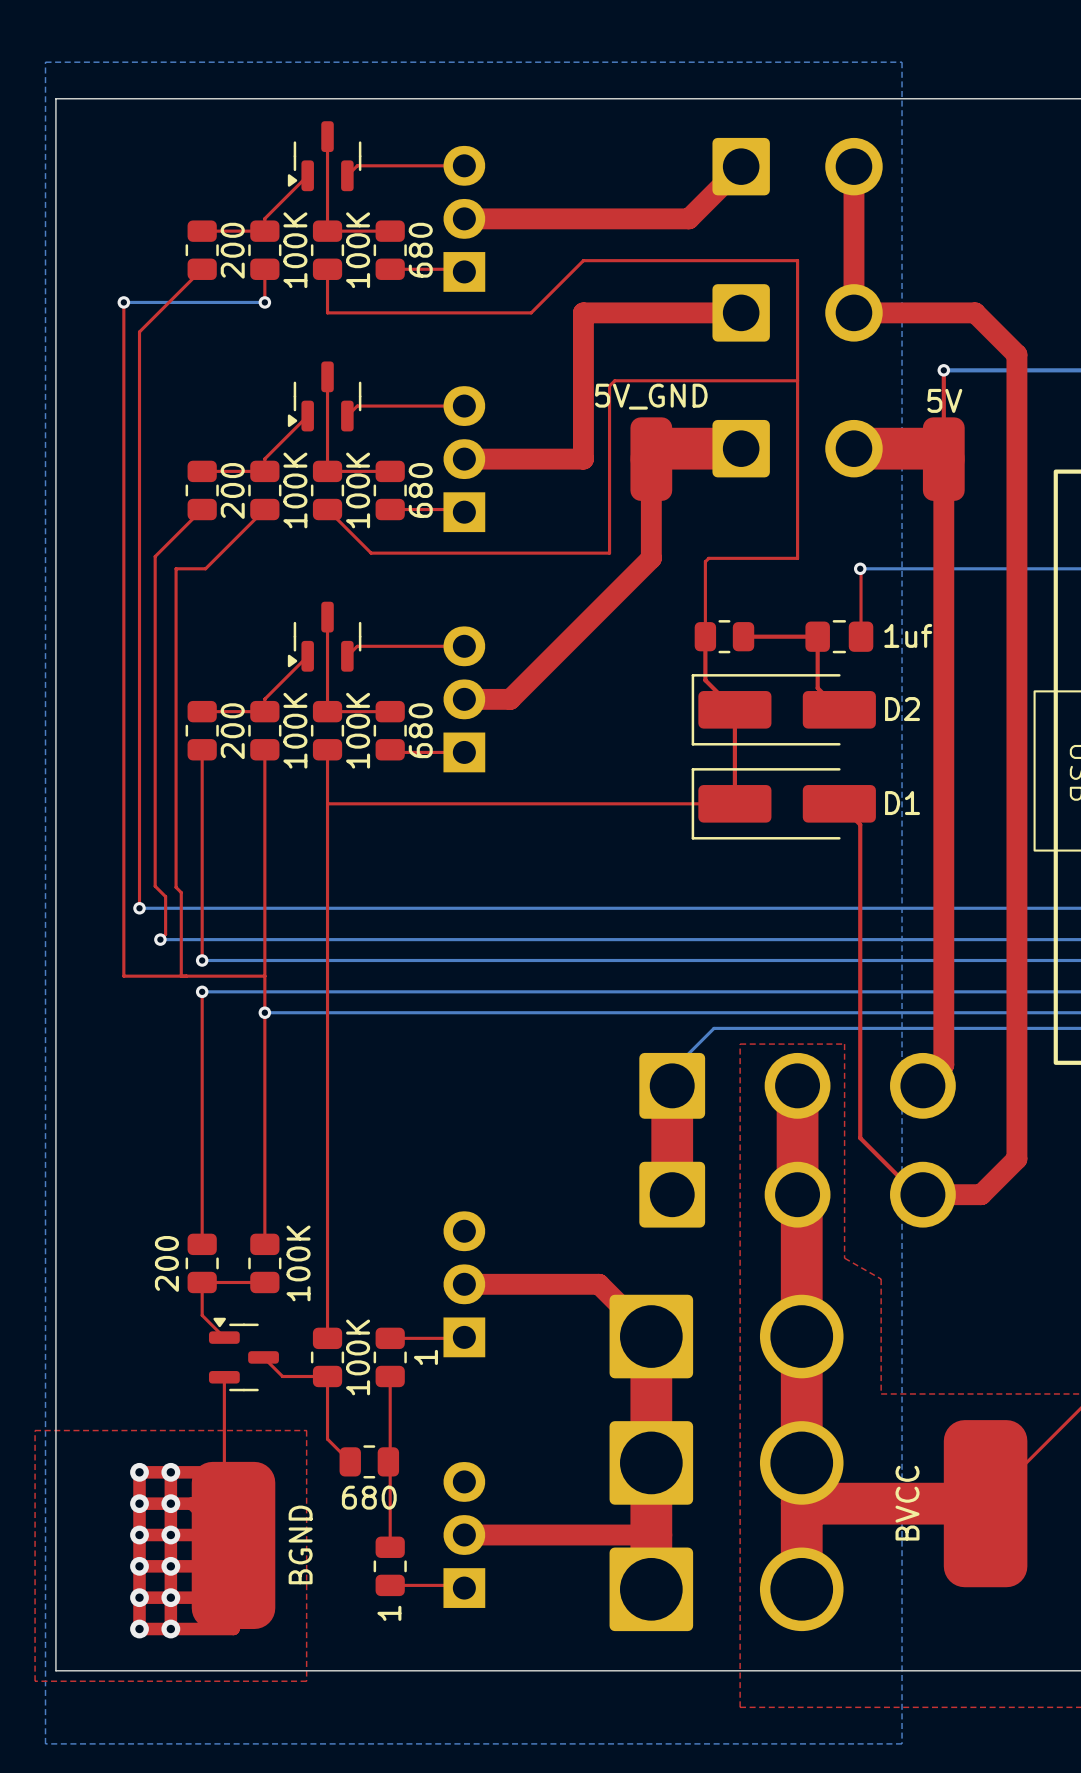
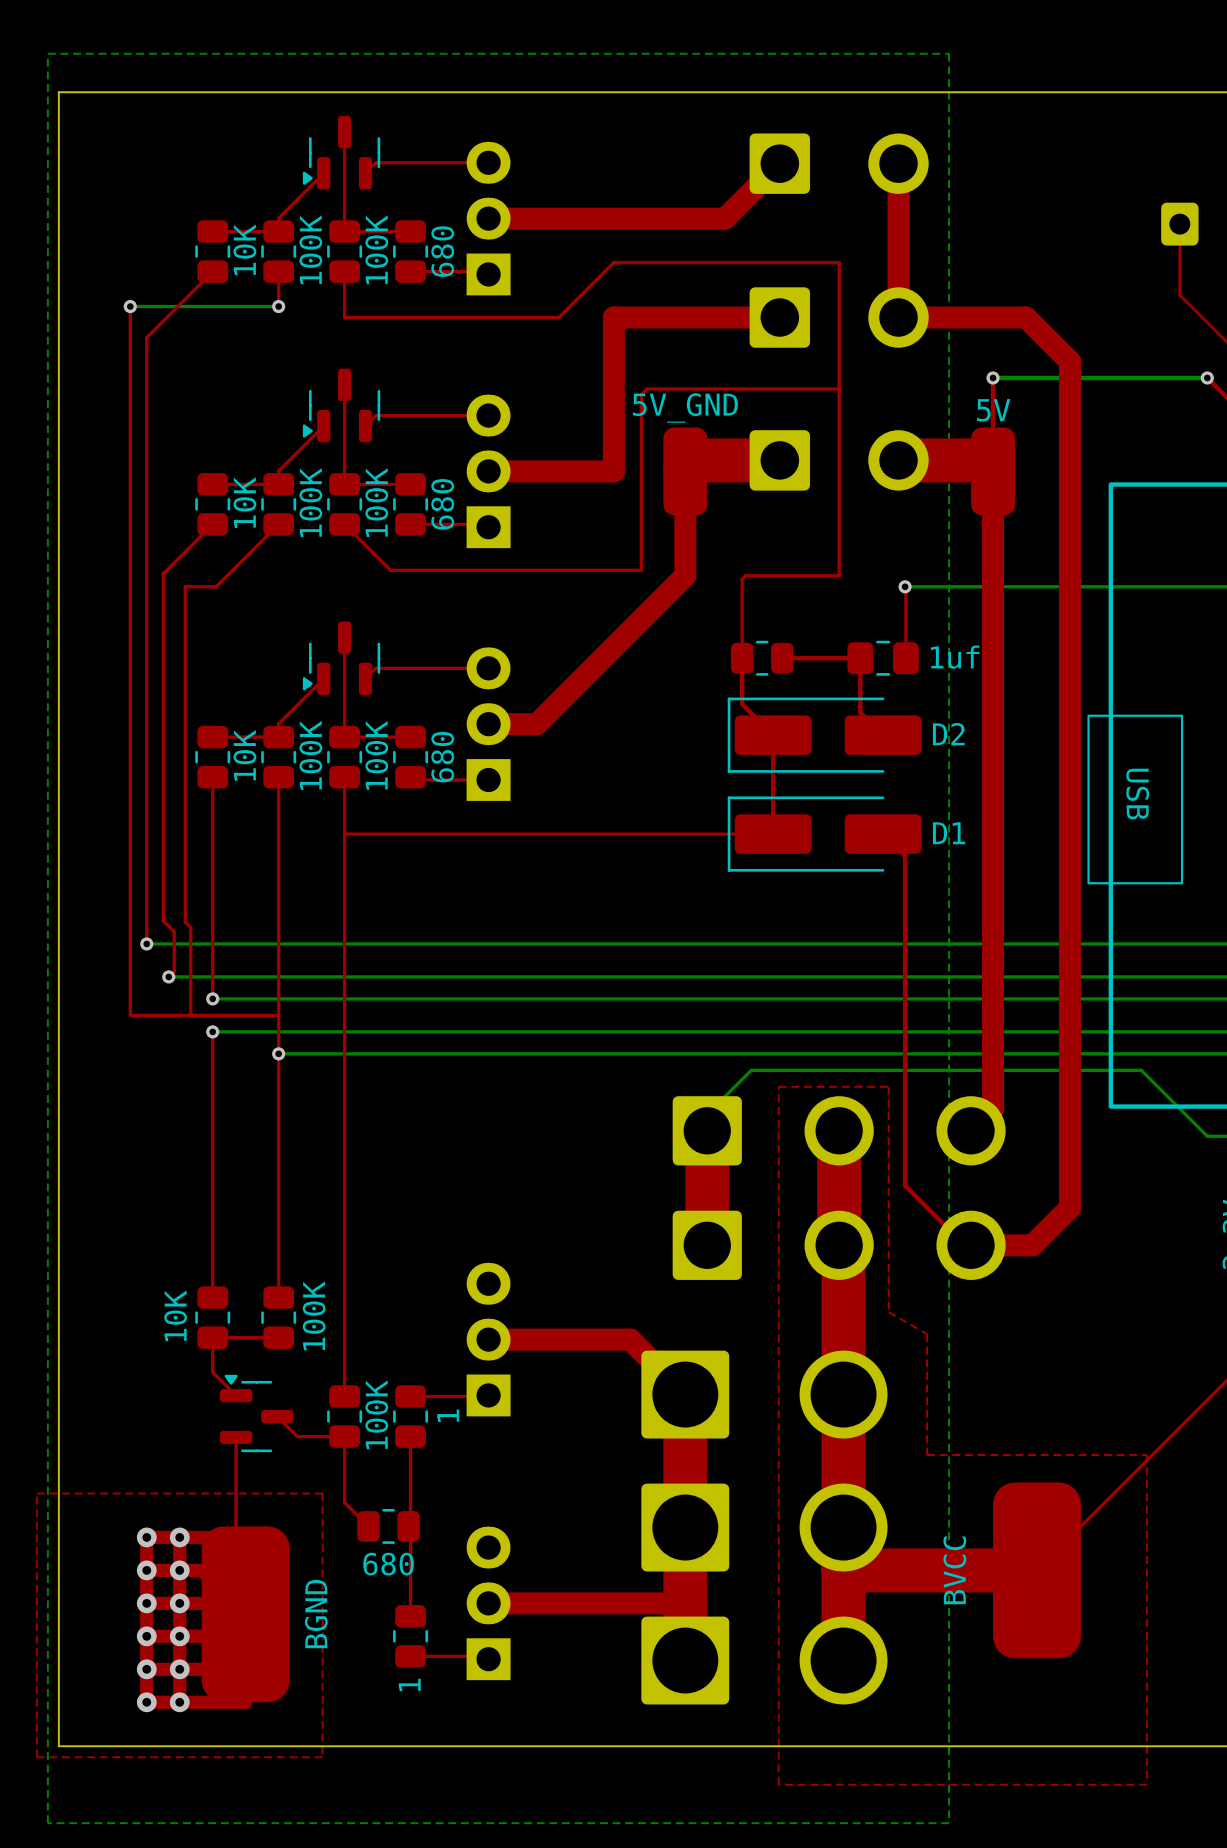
part value: 200 (232, 250) -> 10K (244, 249)
part value: 200 (232, 490) -> 10K (244, 502)
part value: 200 (232, 731) -> 10K (244, 755)
part value: 200 (166, 1263) -> 10K (175, 1315)

